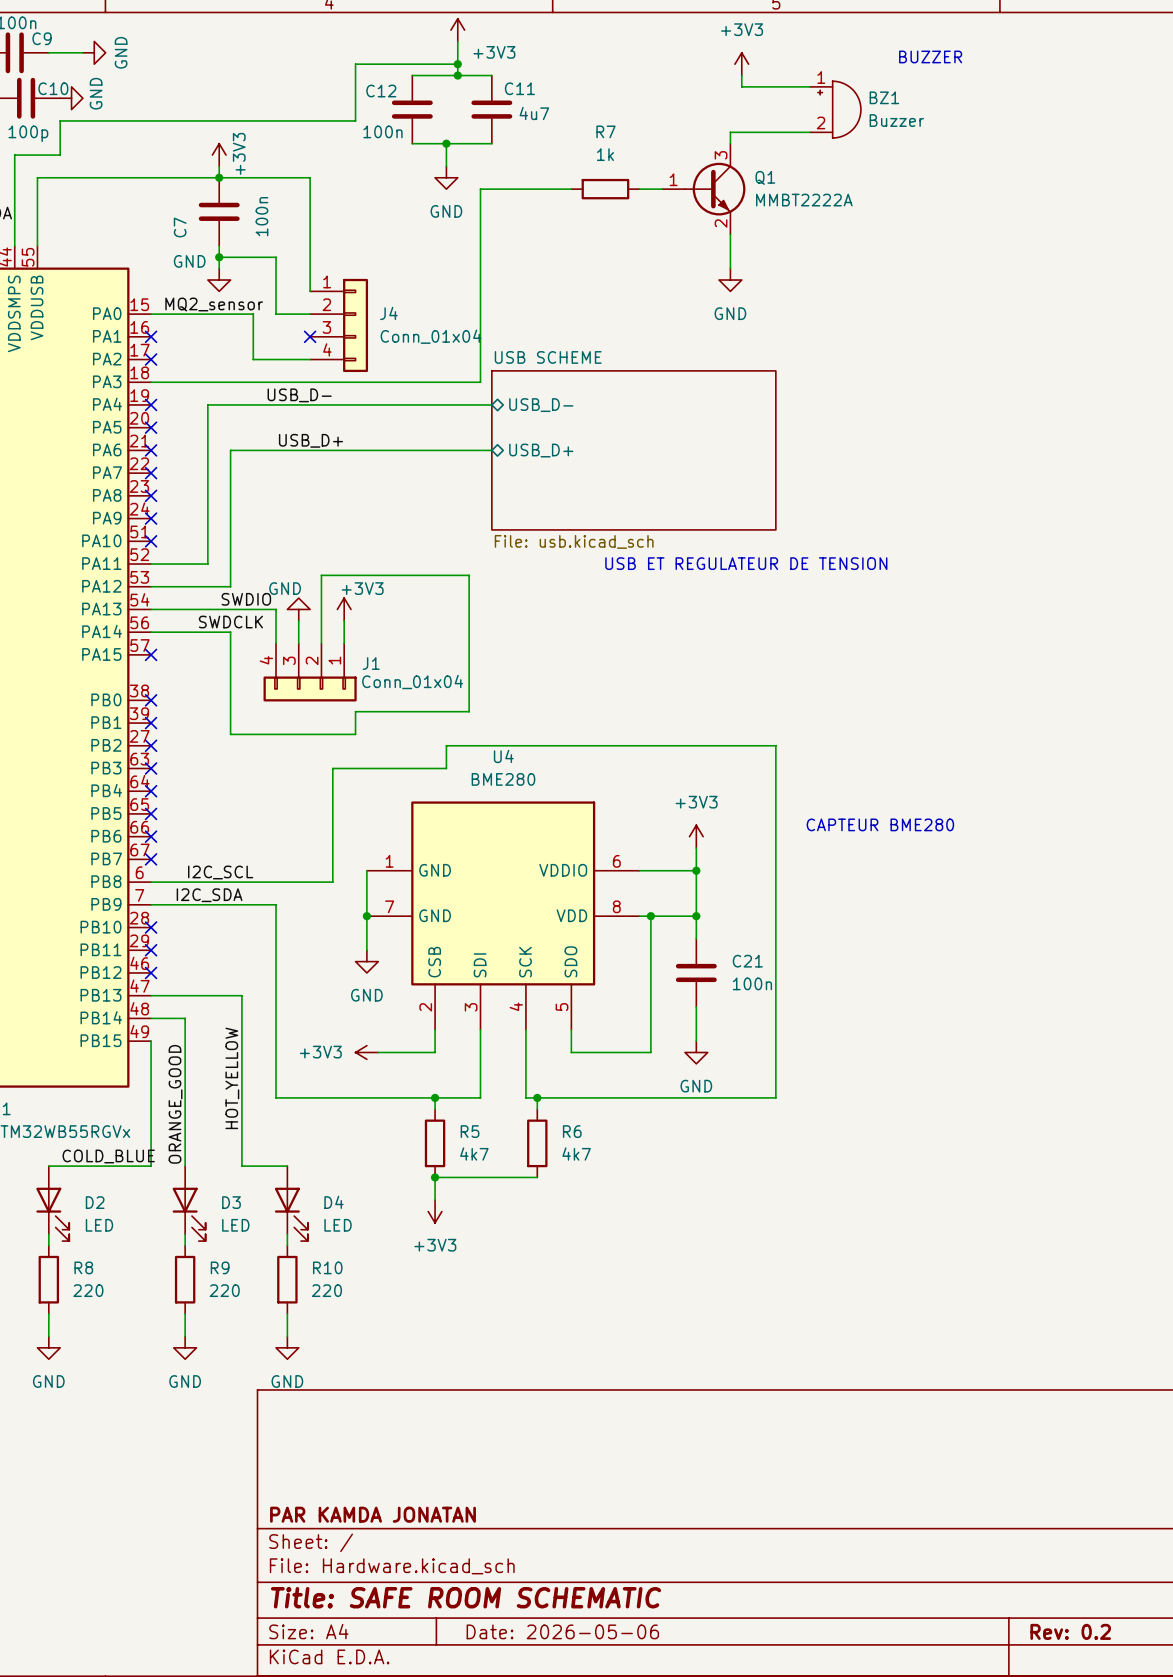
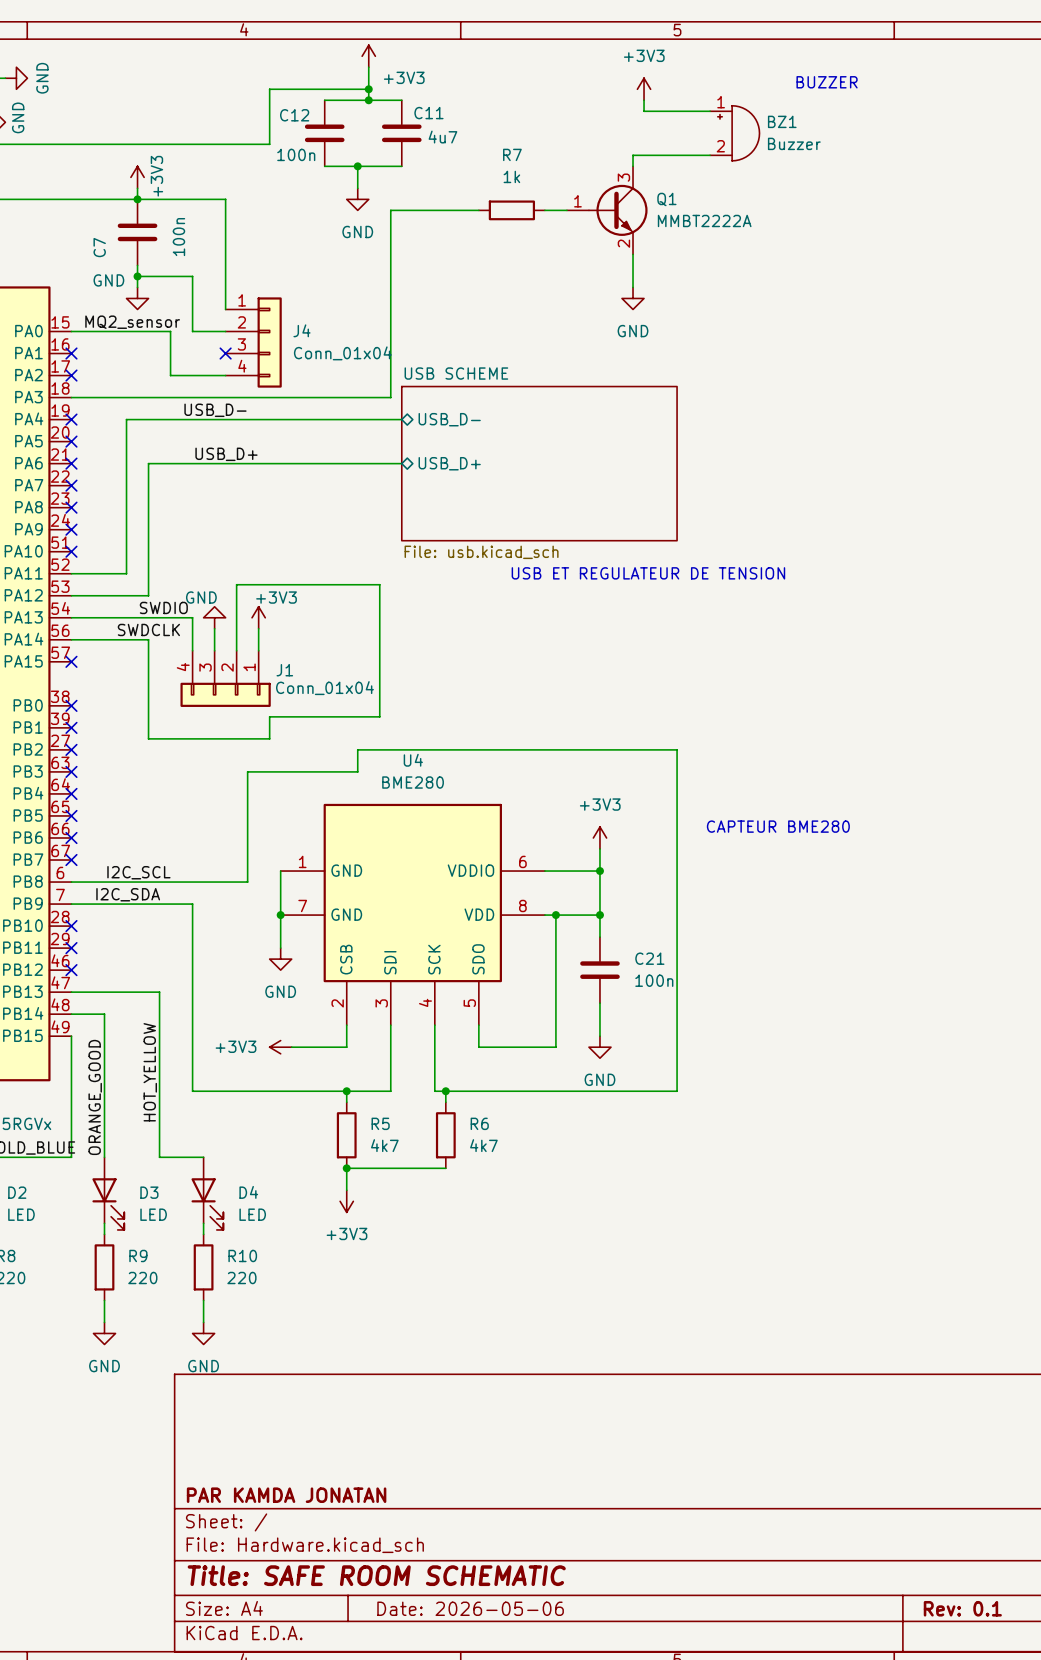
title block: Rev: 0.2 (1070, 1631) -> Rev: 0.1 (962, 1608)

